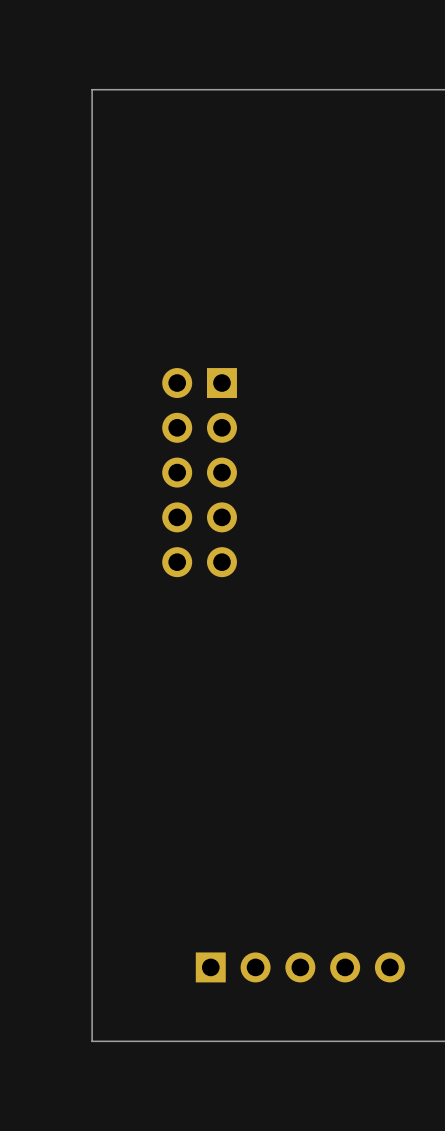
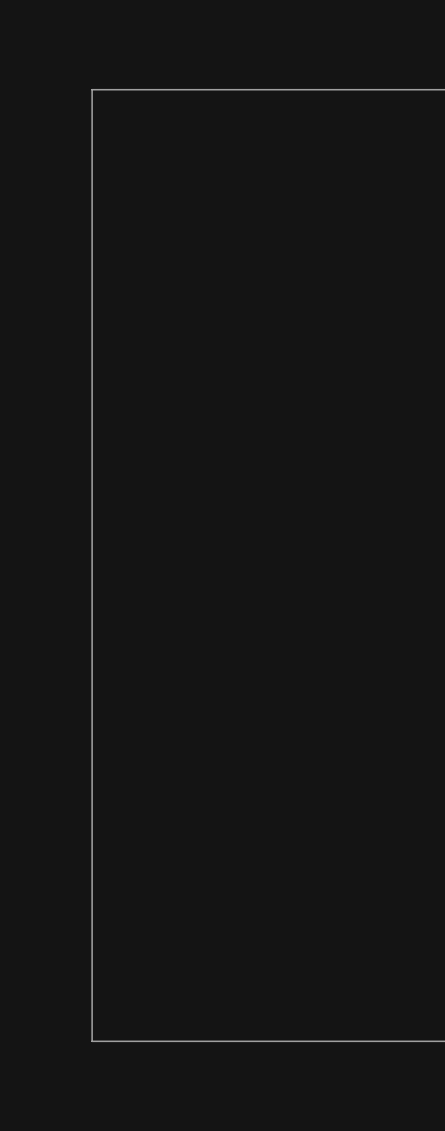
part: (199, 472) -> none
part: (300, 967) -> none

